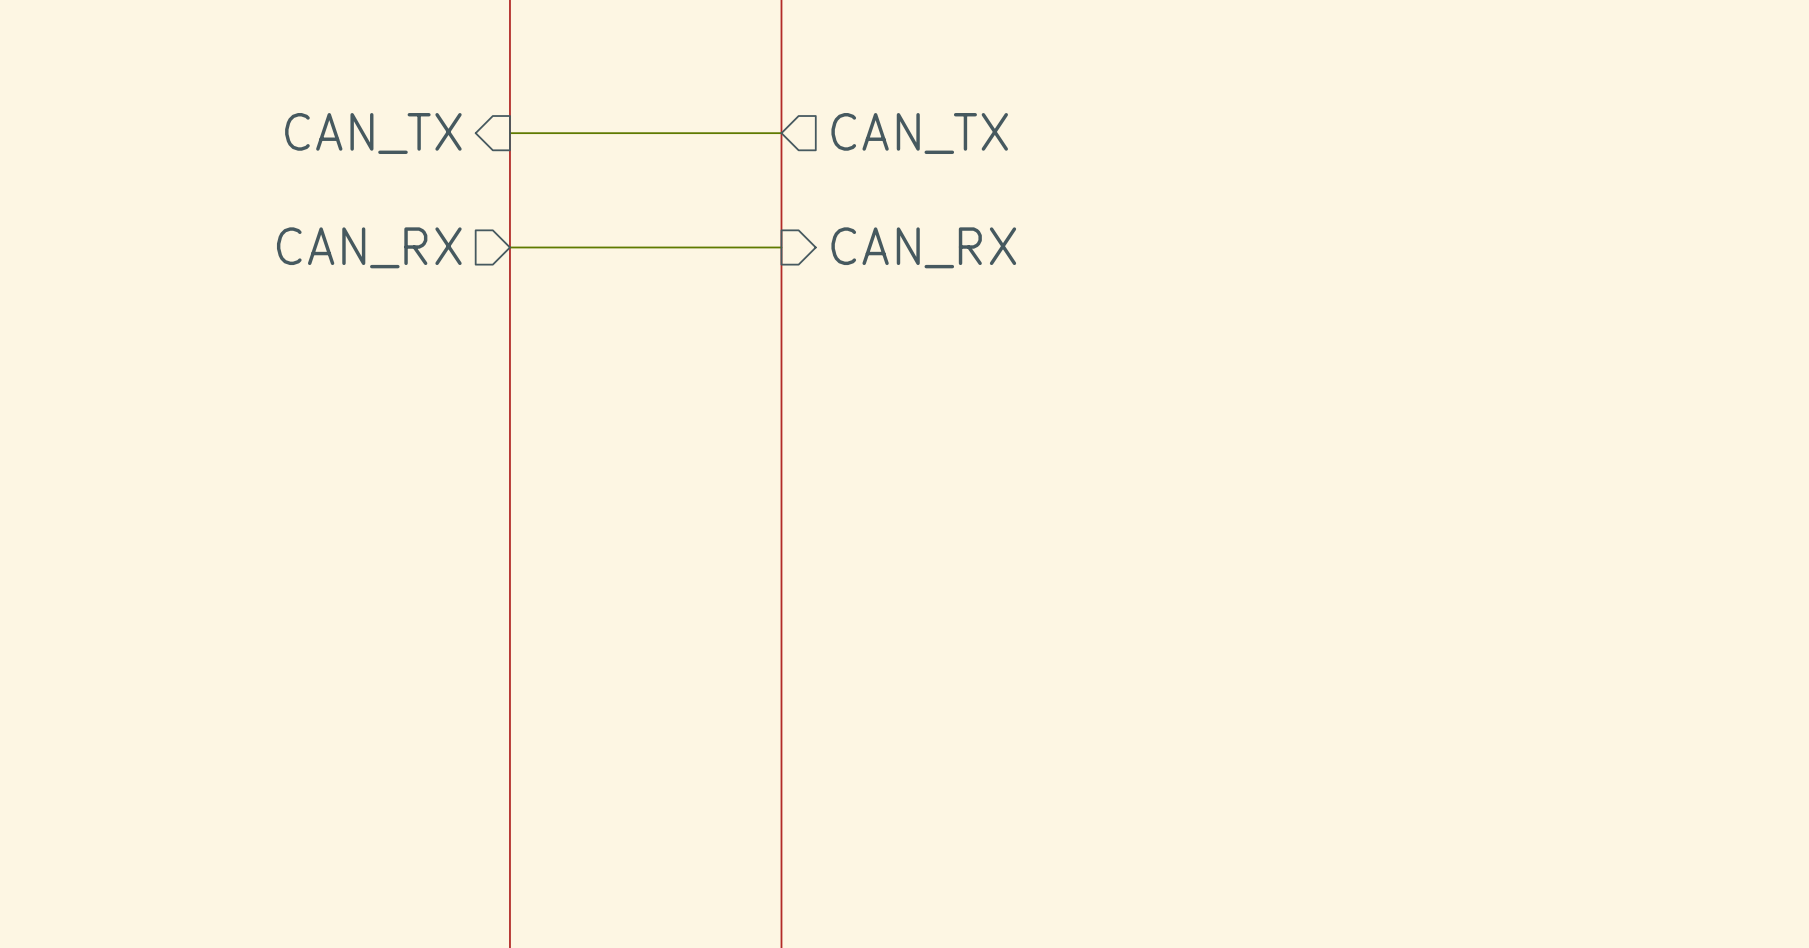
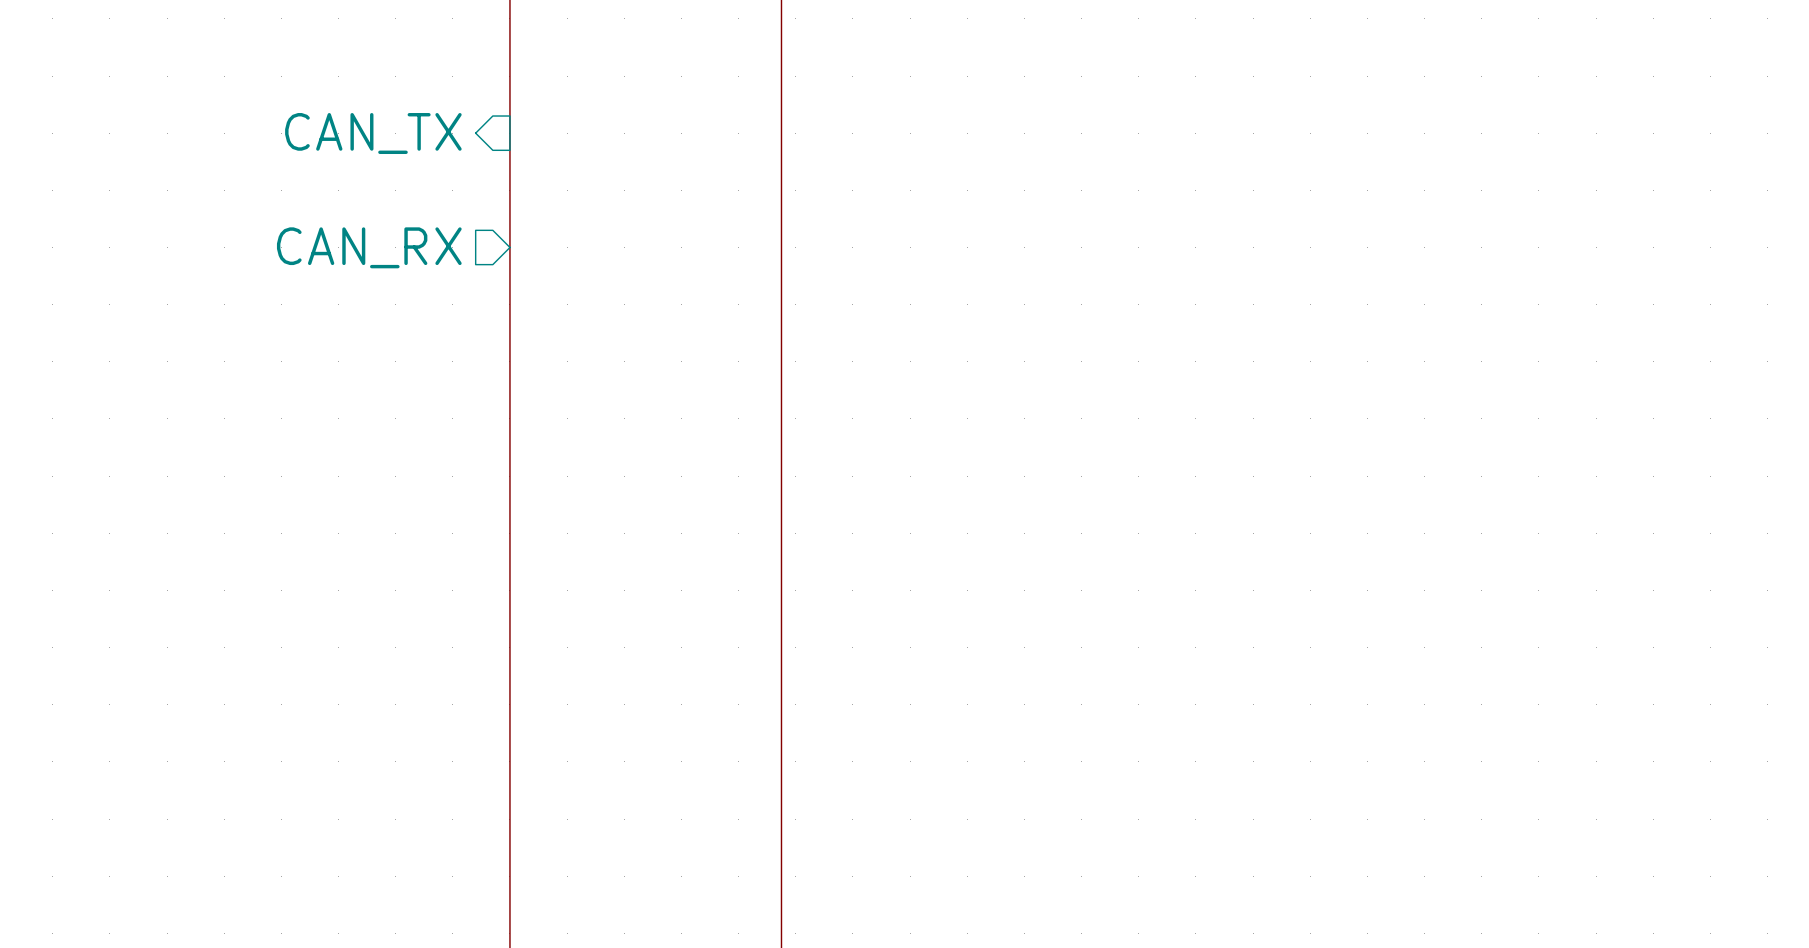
wire: (509, 133) (781, 133) -> none
sheet pin: CAN_TX (919, 133) -> none
wire: (509, 247) (781, 247) -> none
sheet pin: CAN_RX (923, 247) -> none

